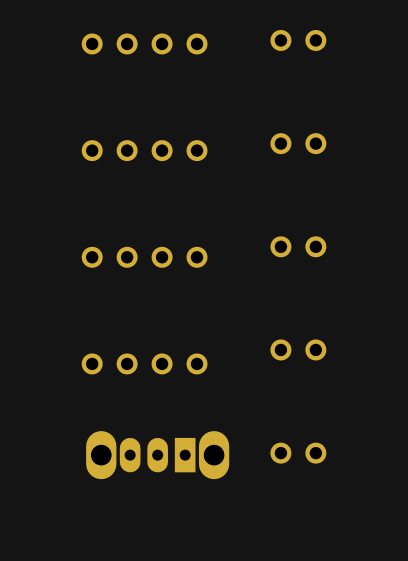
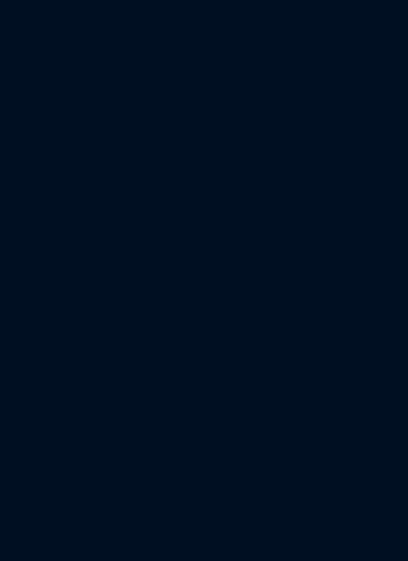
part: (298, 40) -> none
part: (144, 43) -> none
part: (298, 143) -> none
part: (144, 150) -> none
part: (298, 246) -> none
part: (144, 257) -> none
part: (298, 349) -> none
part: (144, 363) -> none
part: (298, 453) -> none
part: (157, 455) -> none

